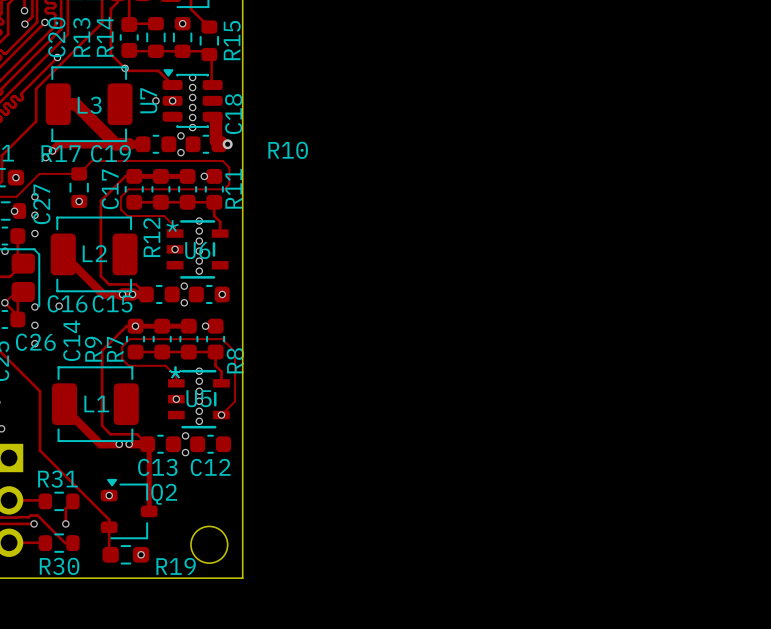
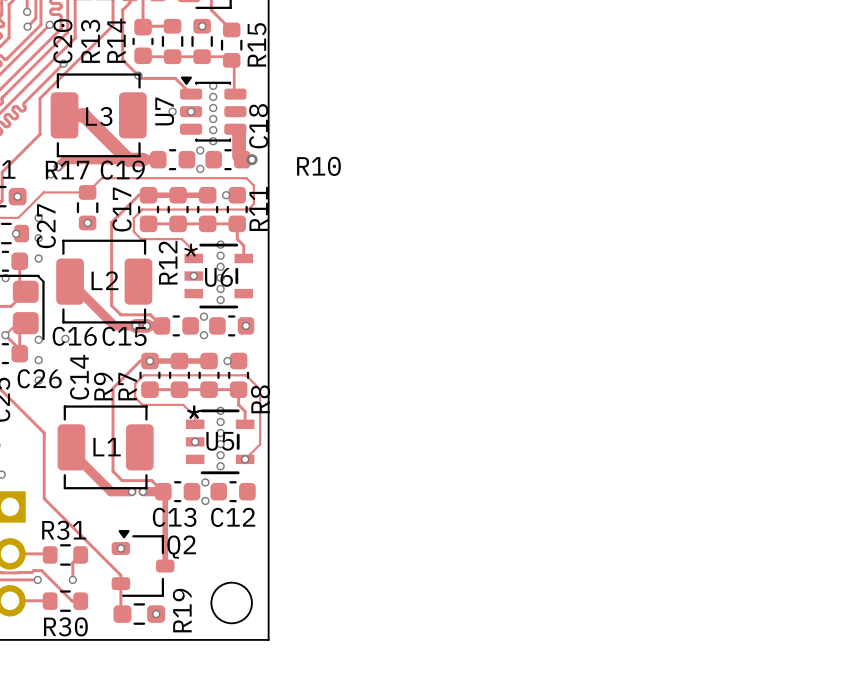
R19 name rotation: 0° (176, 566) -> 90° counterclockwise (182, 610)

